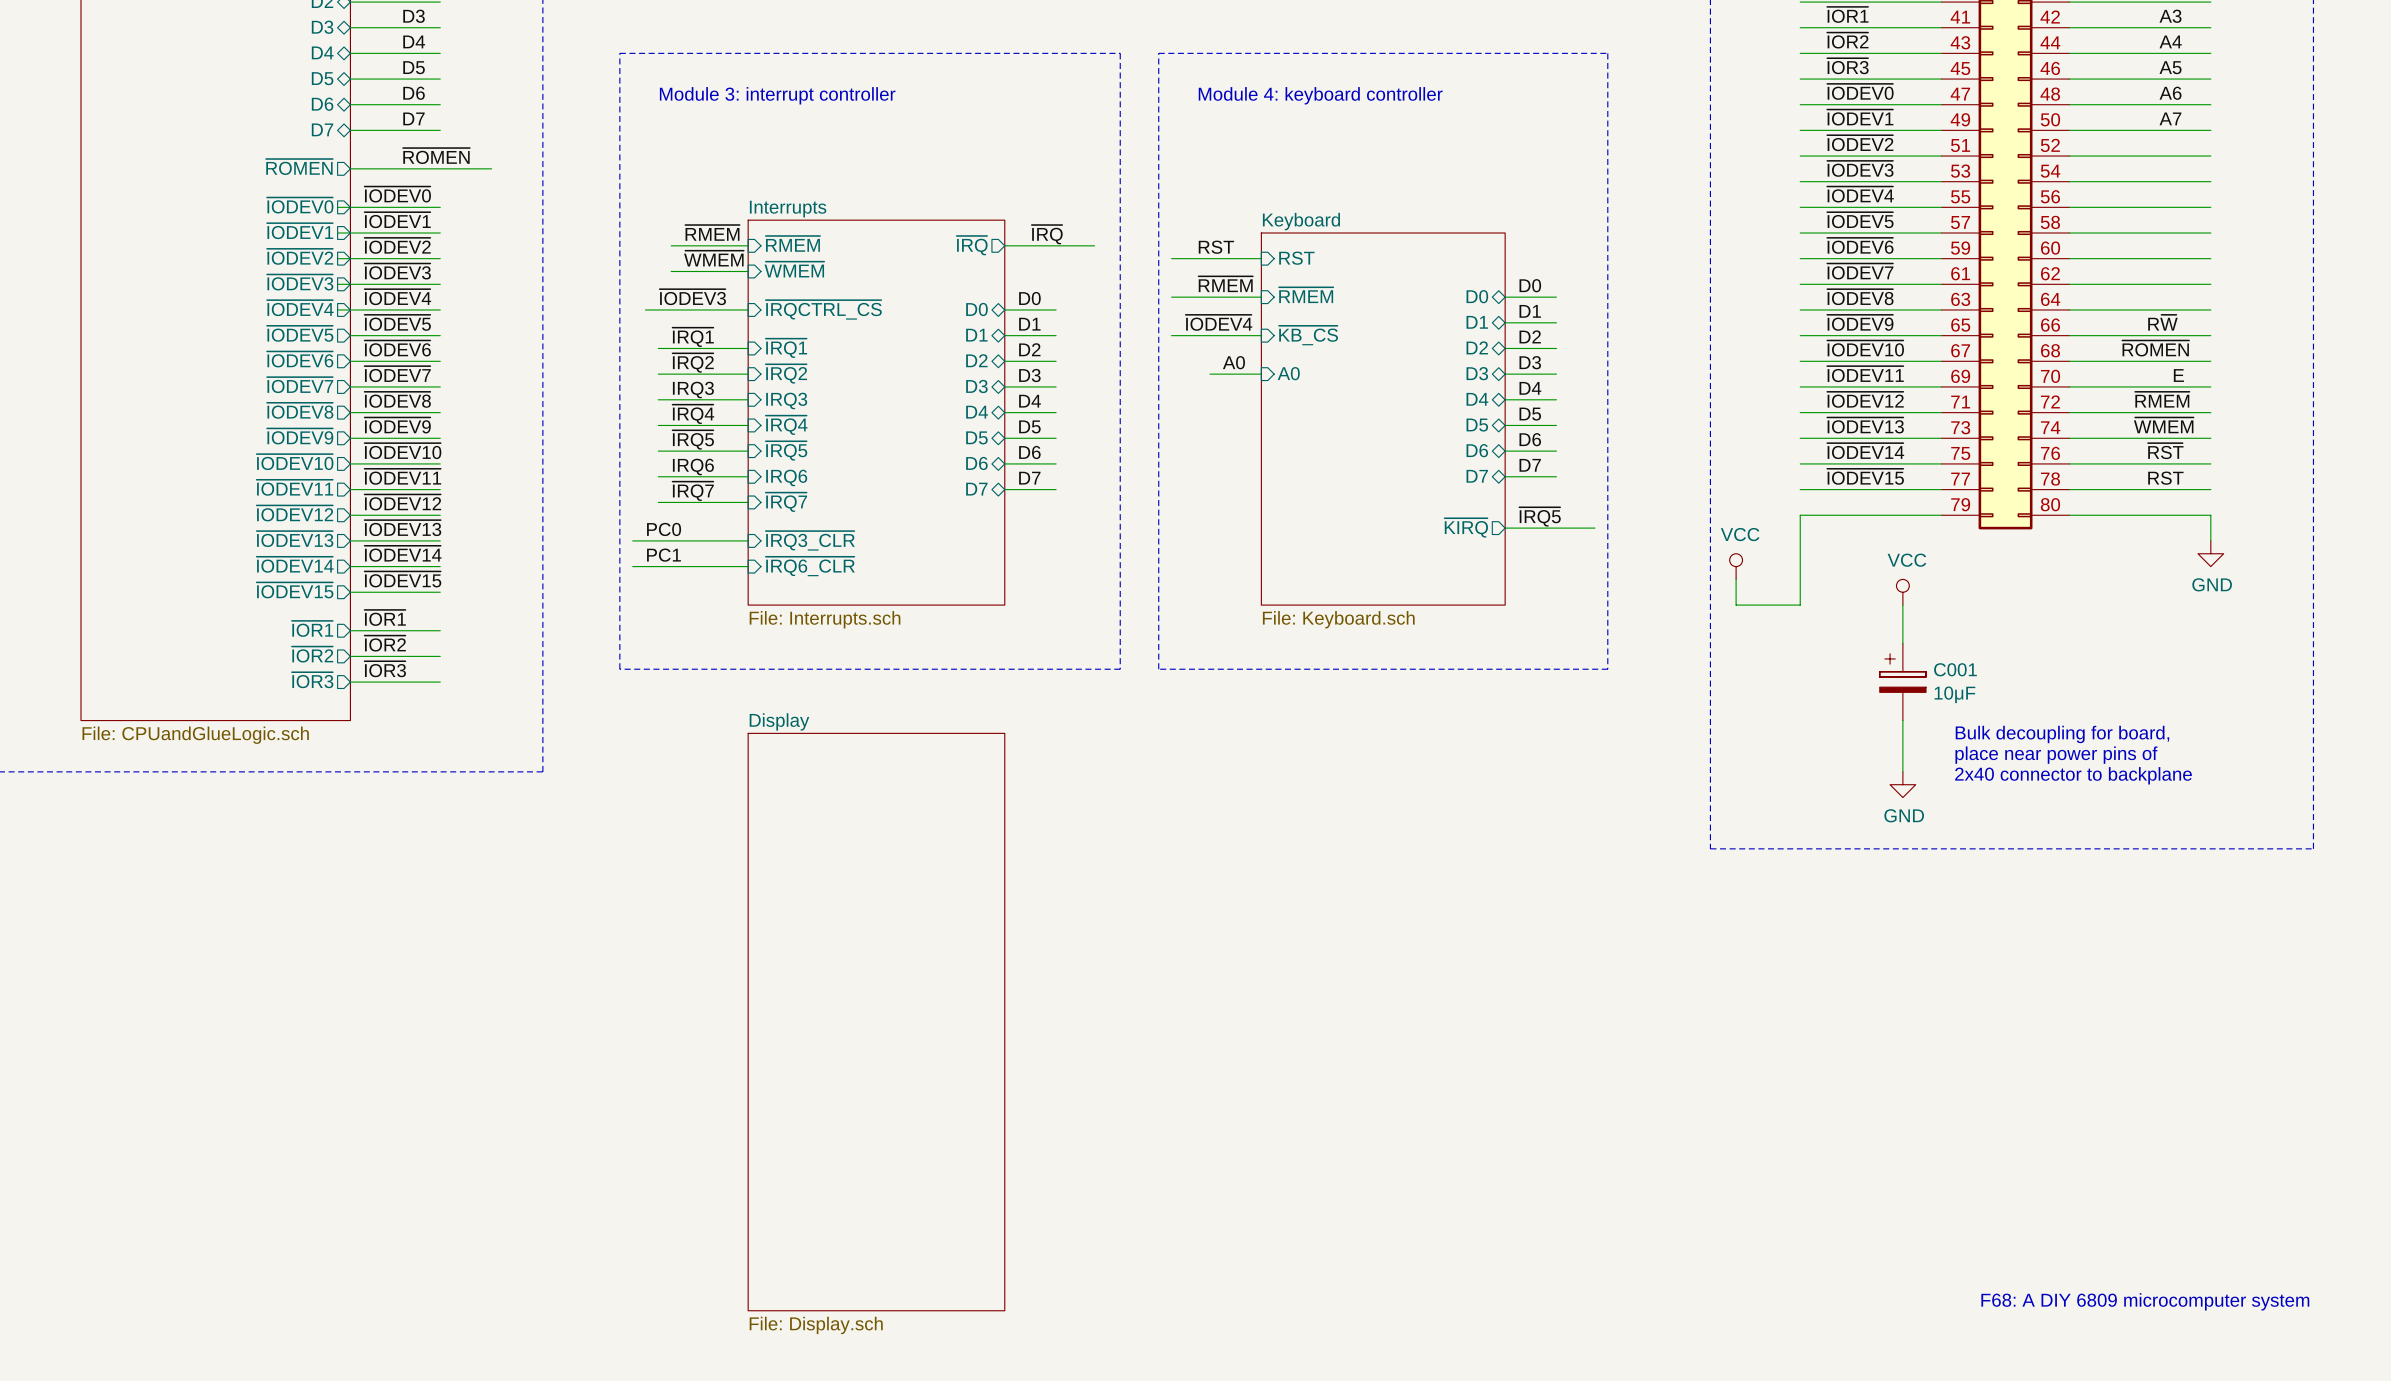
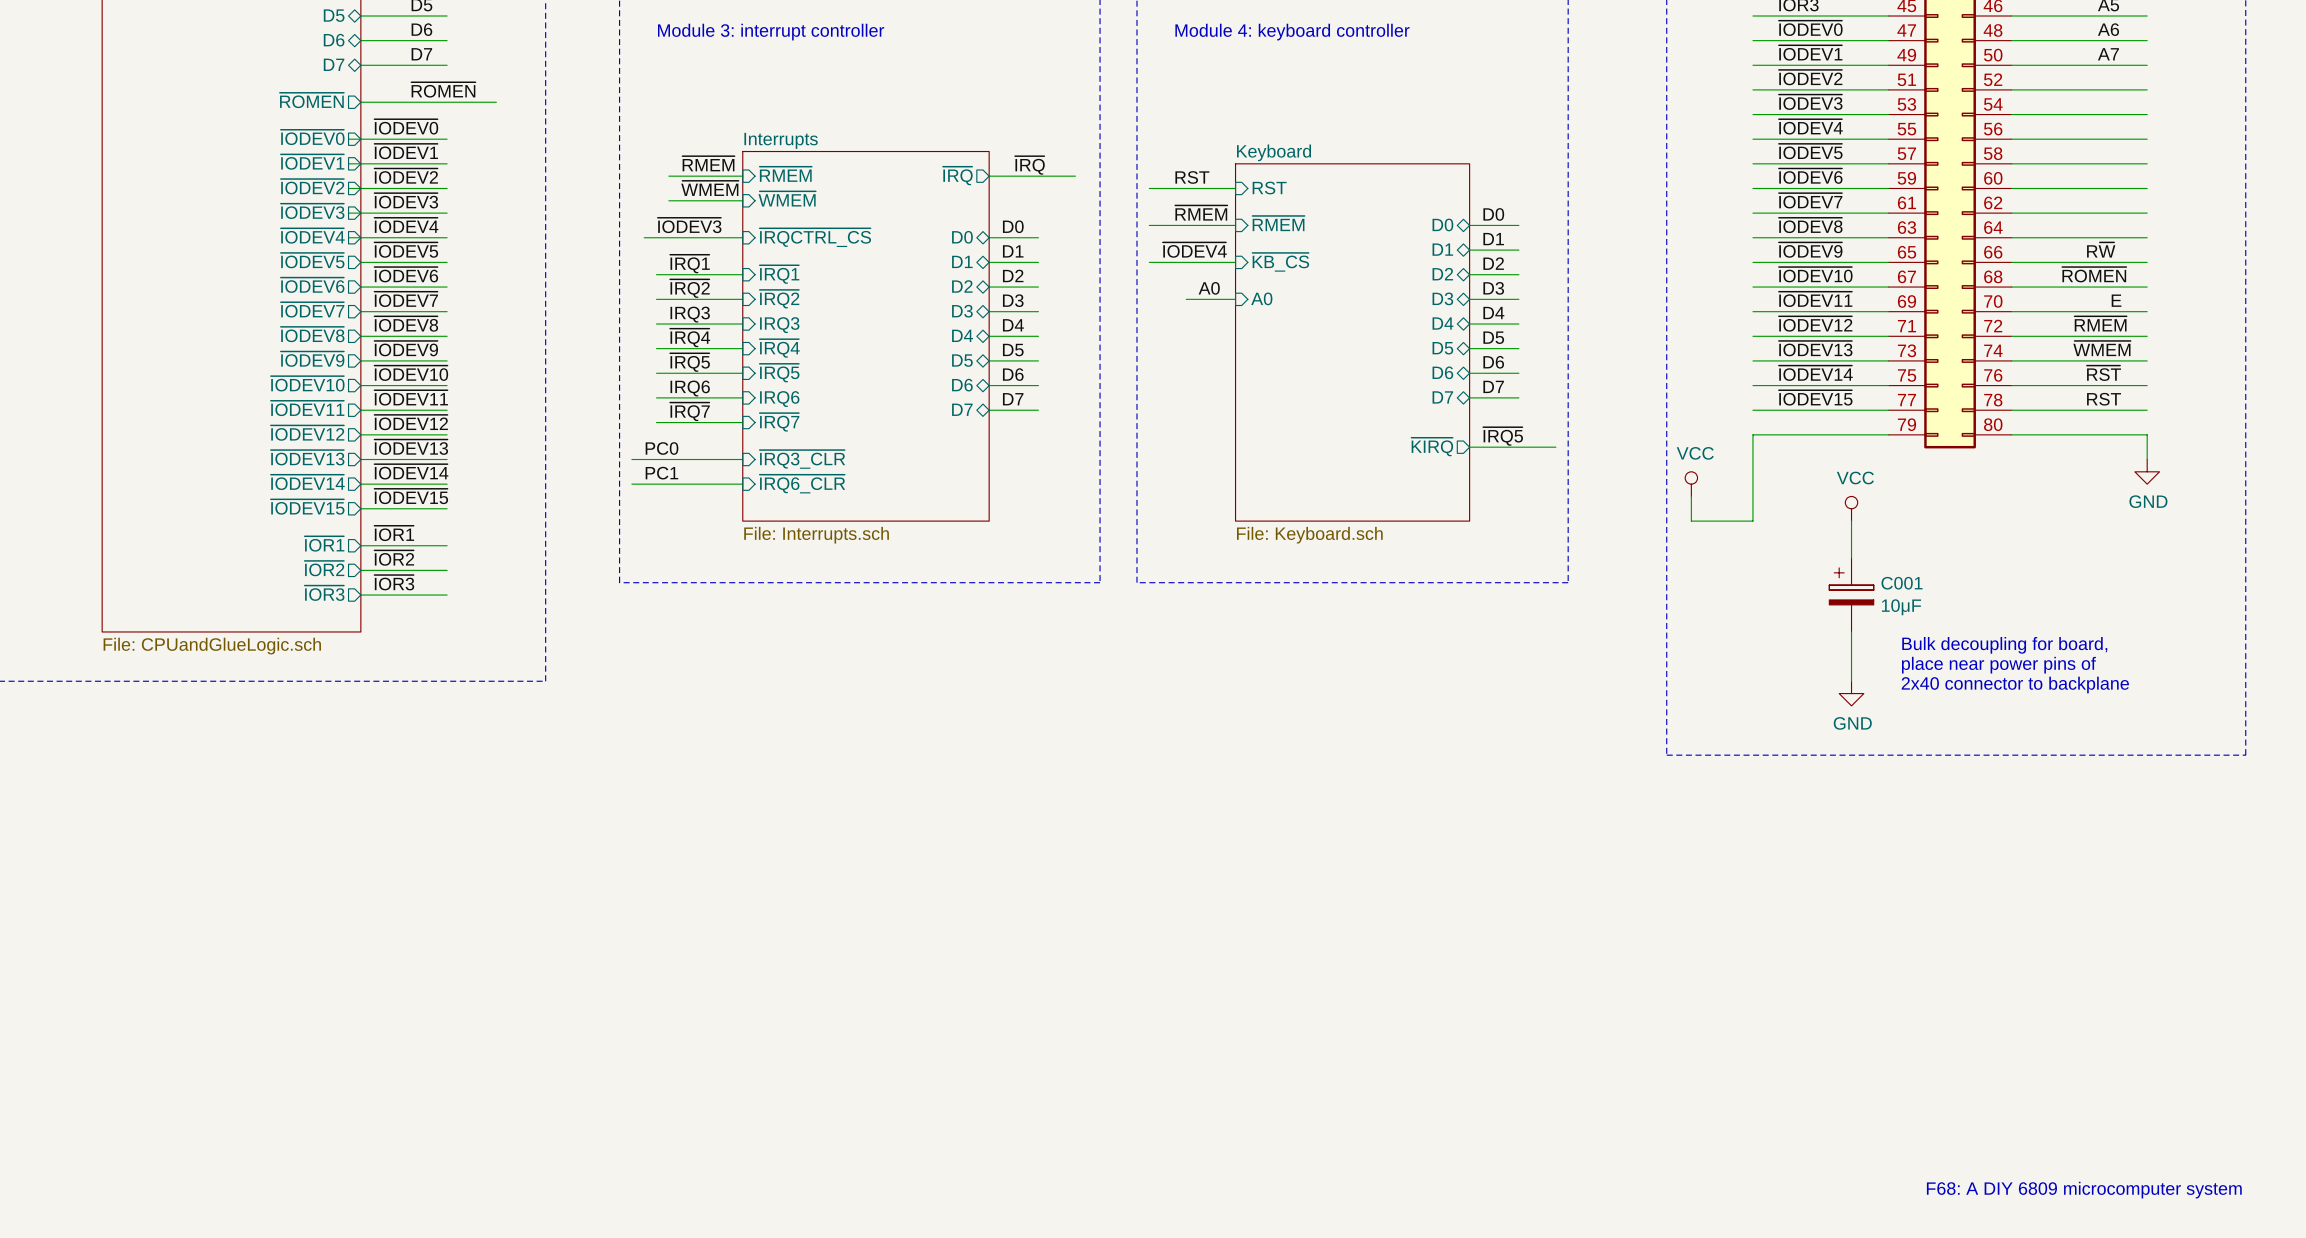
sheet Display: File: Display.sch (876, 1022) -> none

